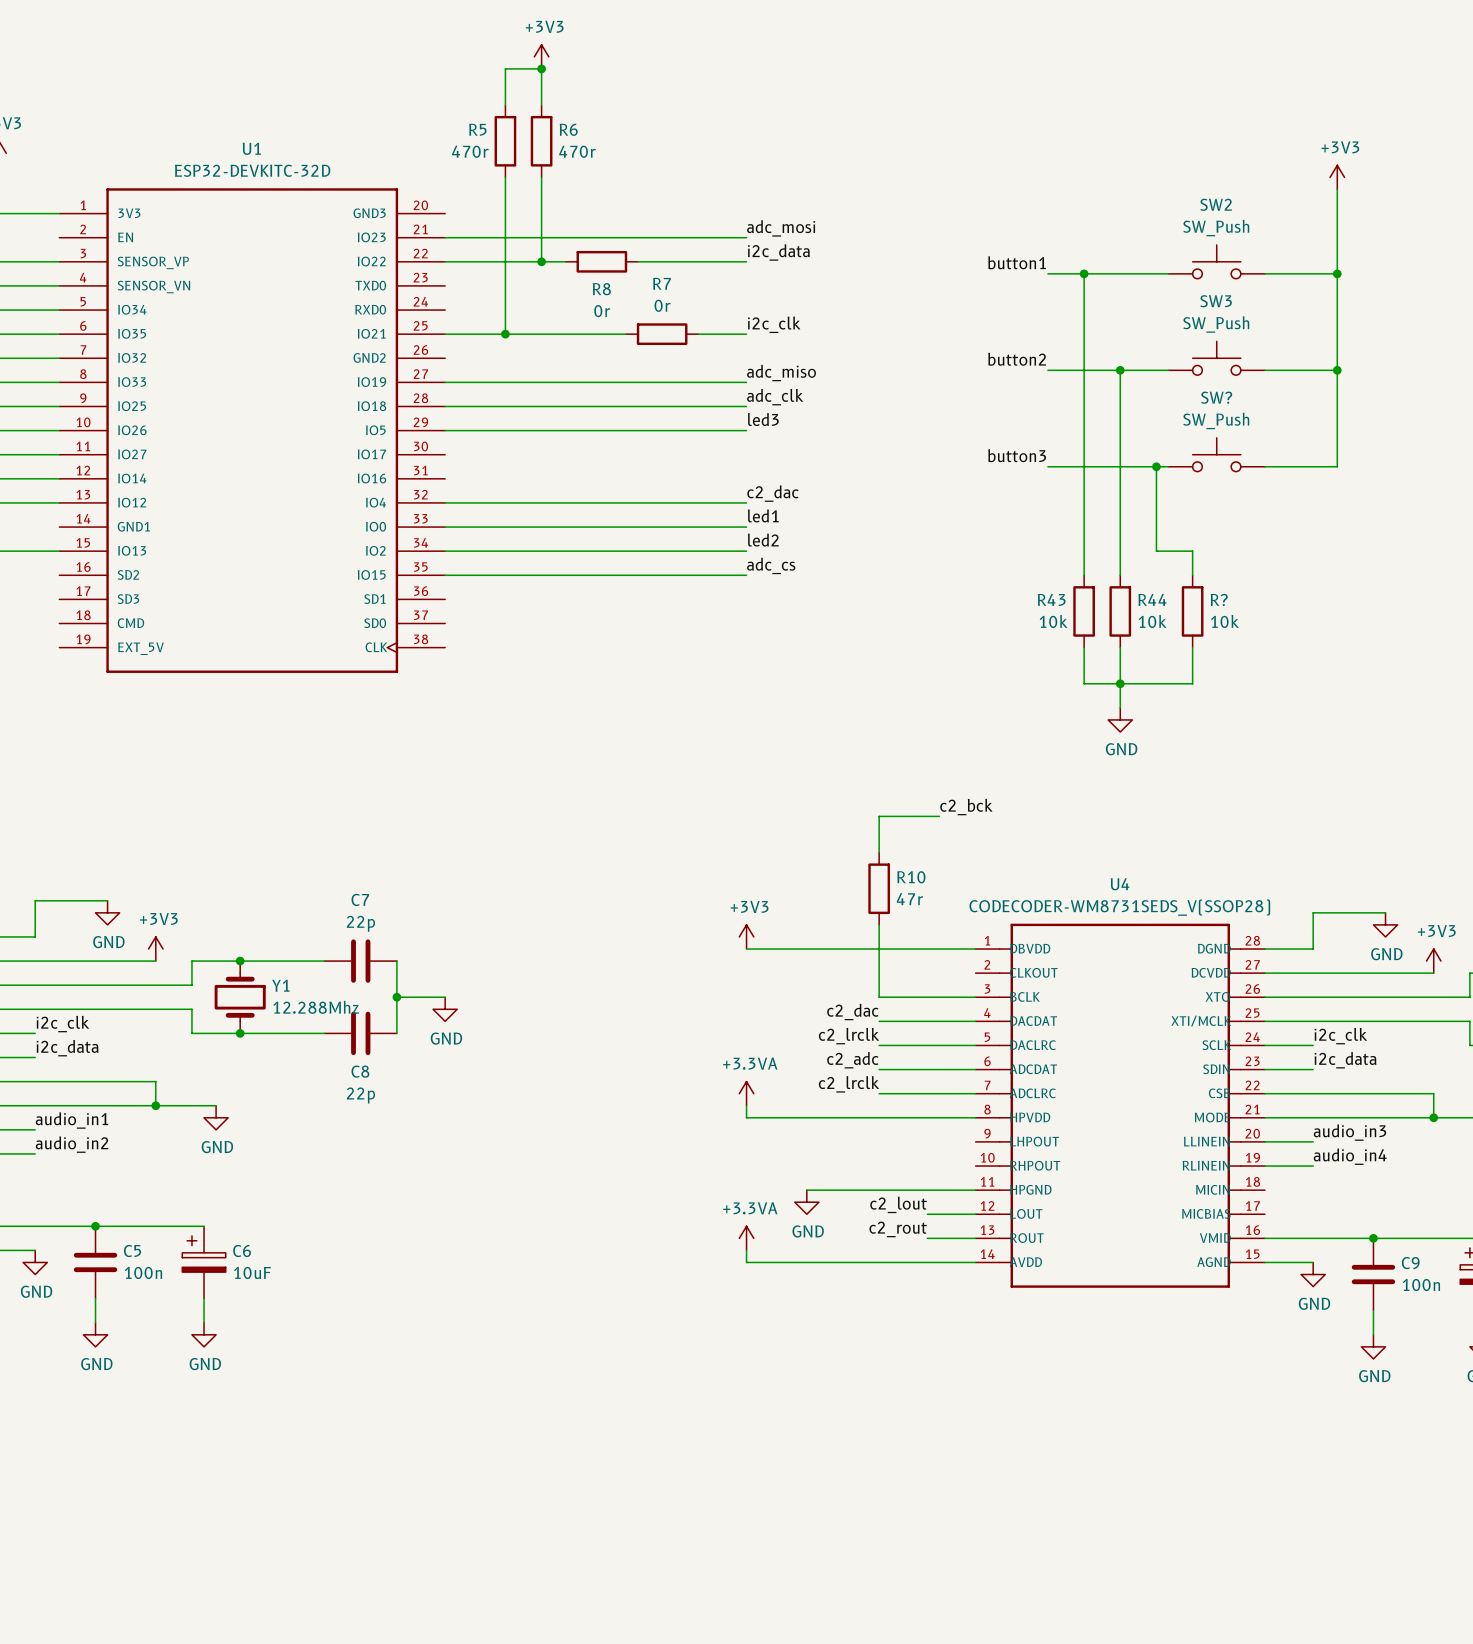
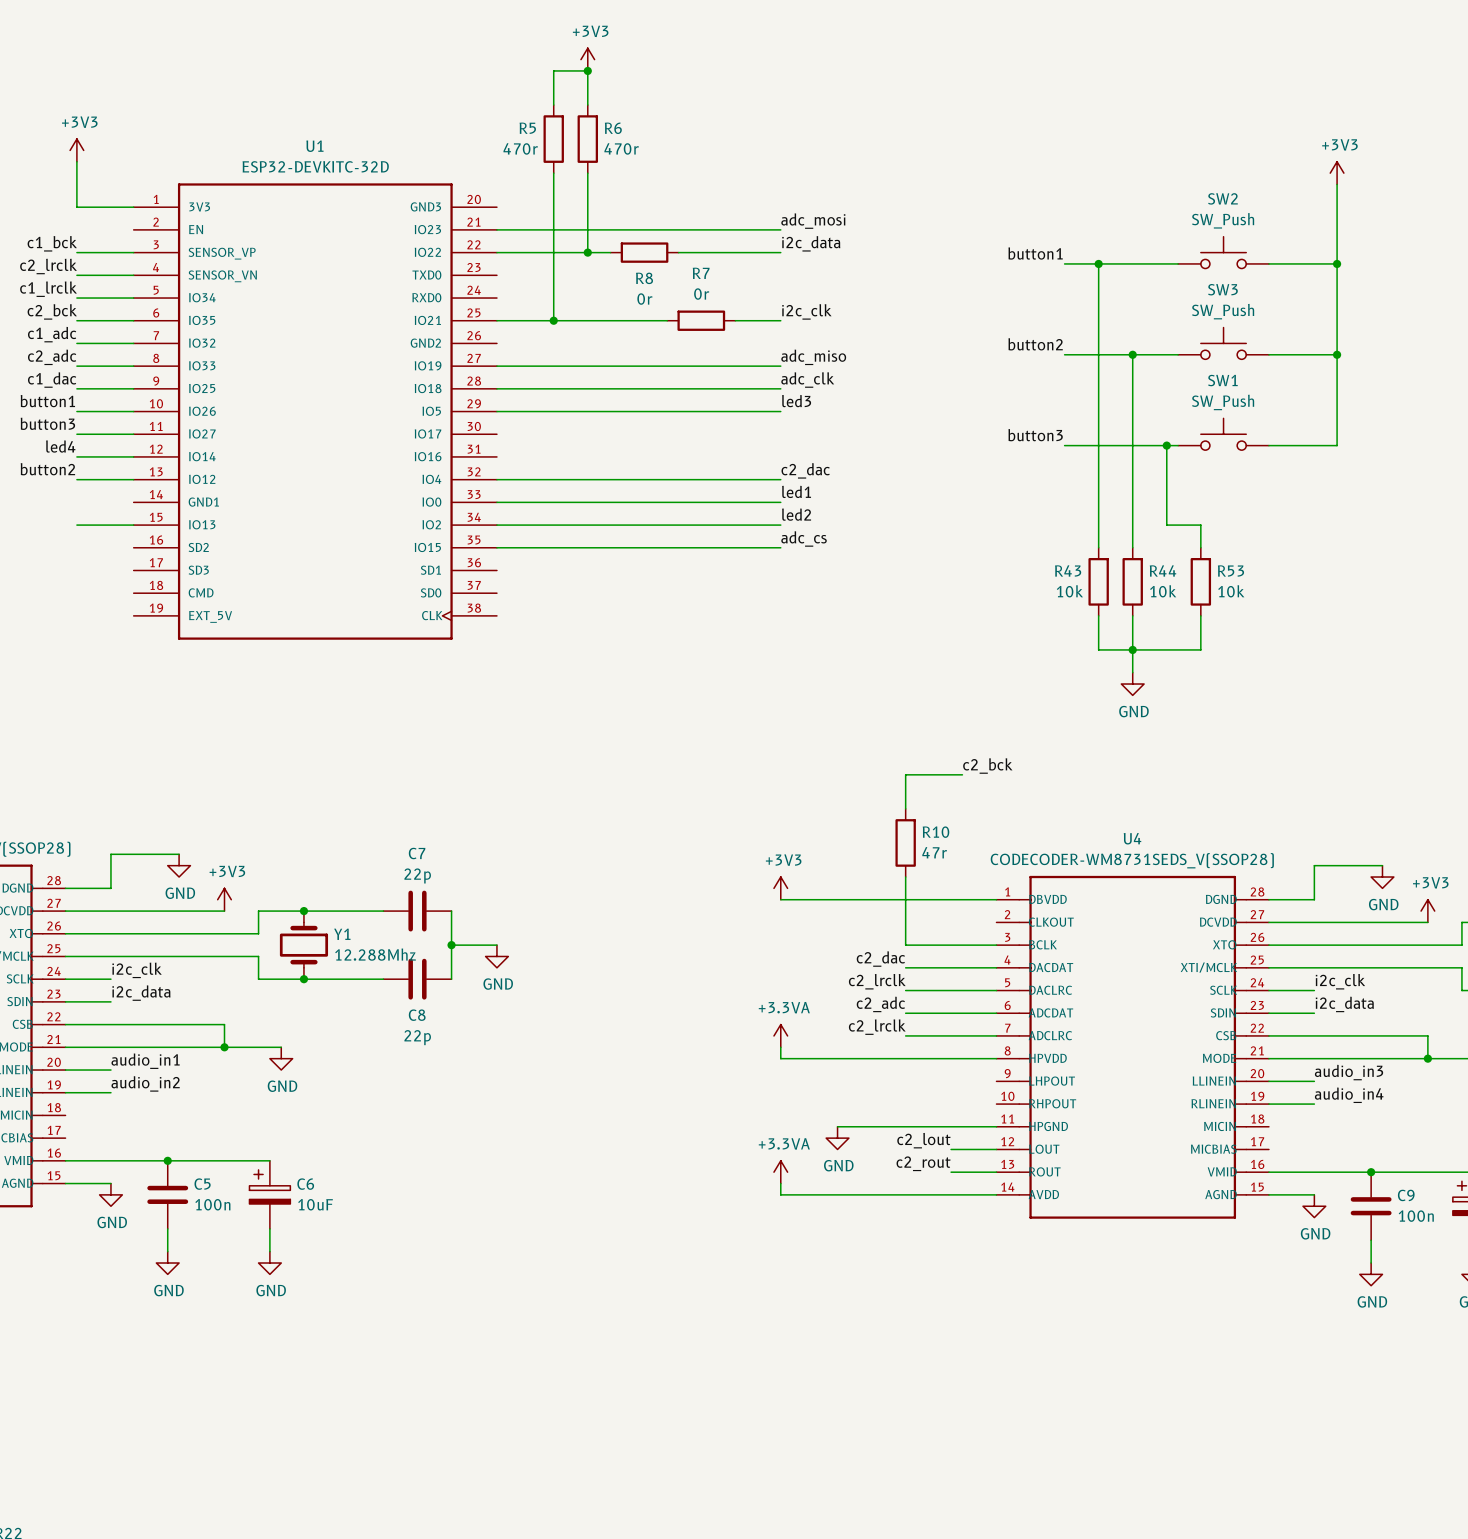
SW? name: SW? (1216, 397) -> SW1 (1222, 380)
R? name: R? (1219, 599) -> R53 (1230, 571)

